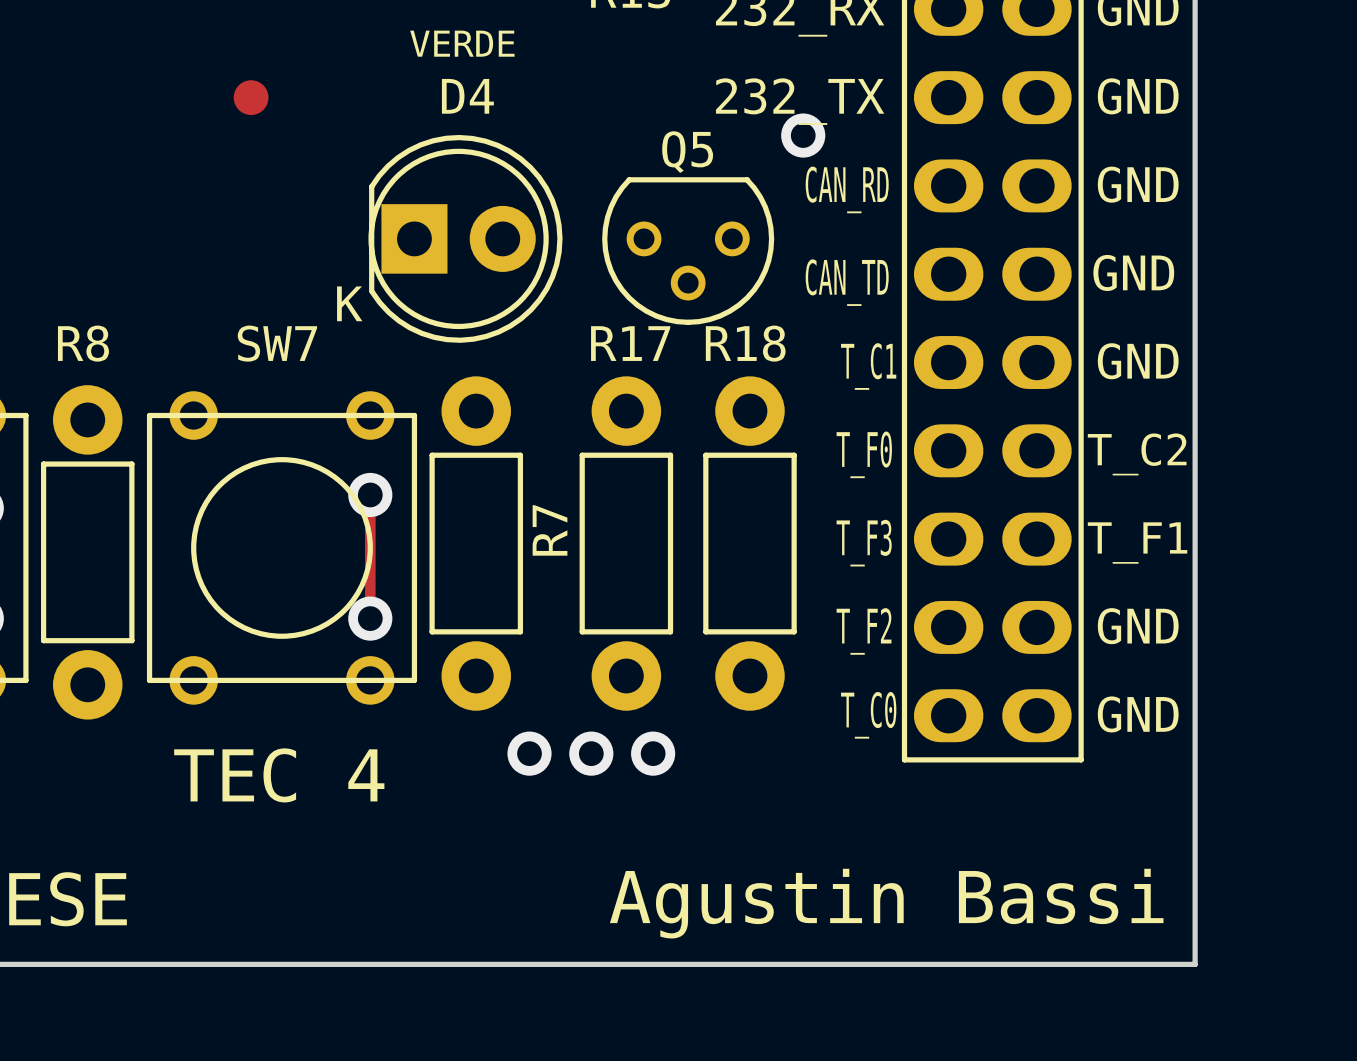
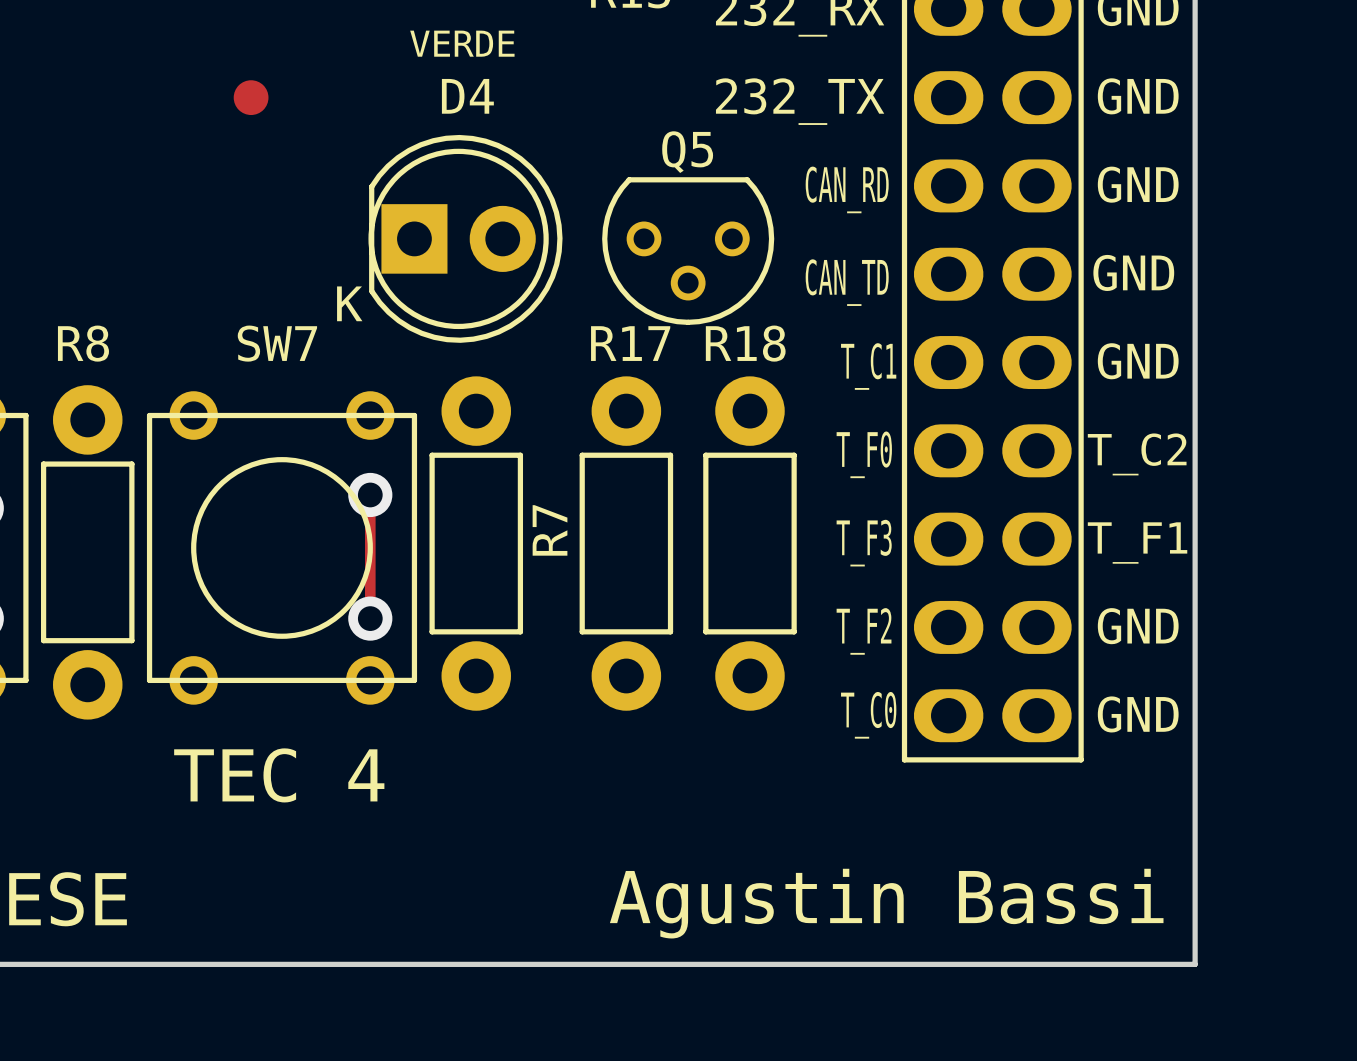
via: (803, 135) -> none
via: (529, 753) -> none
via: (591, 753) -> none
via: (653, 753) -> none

